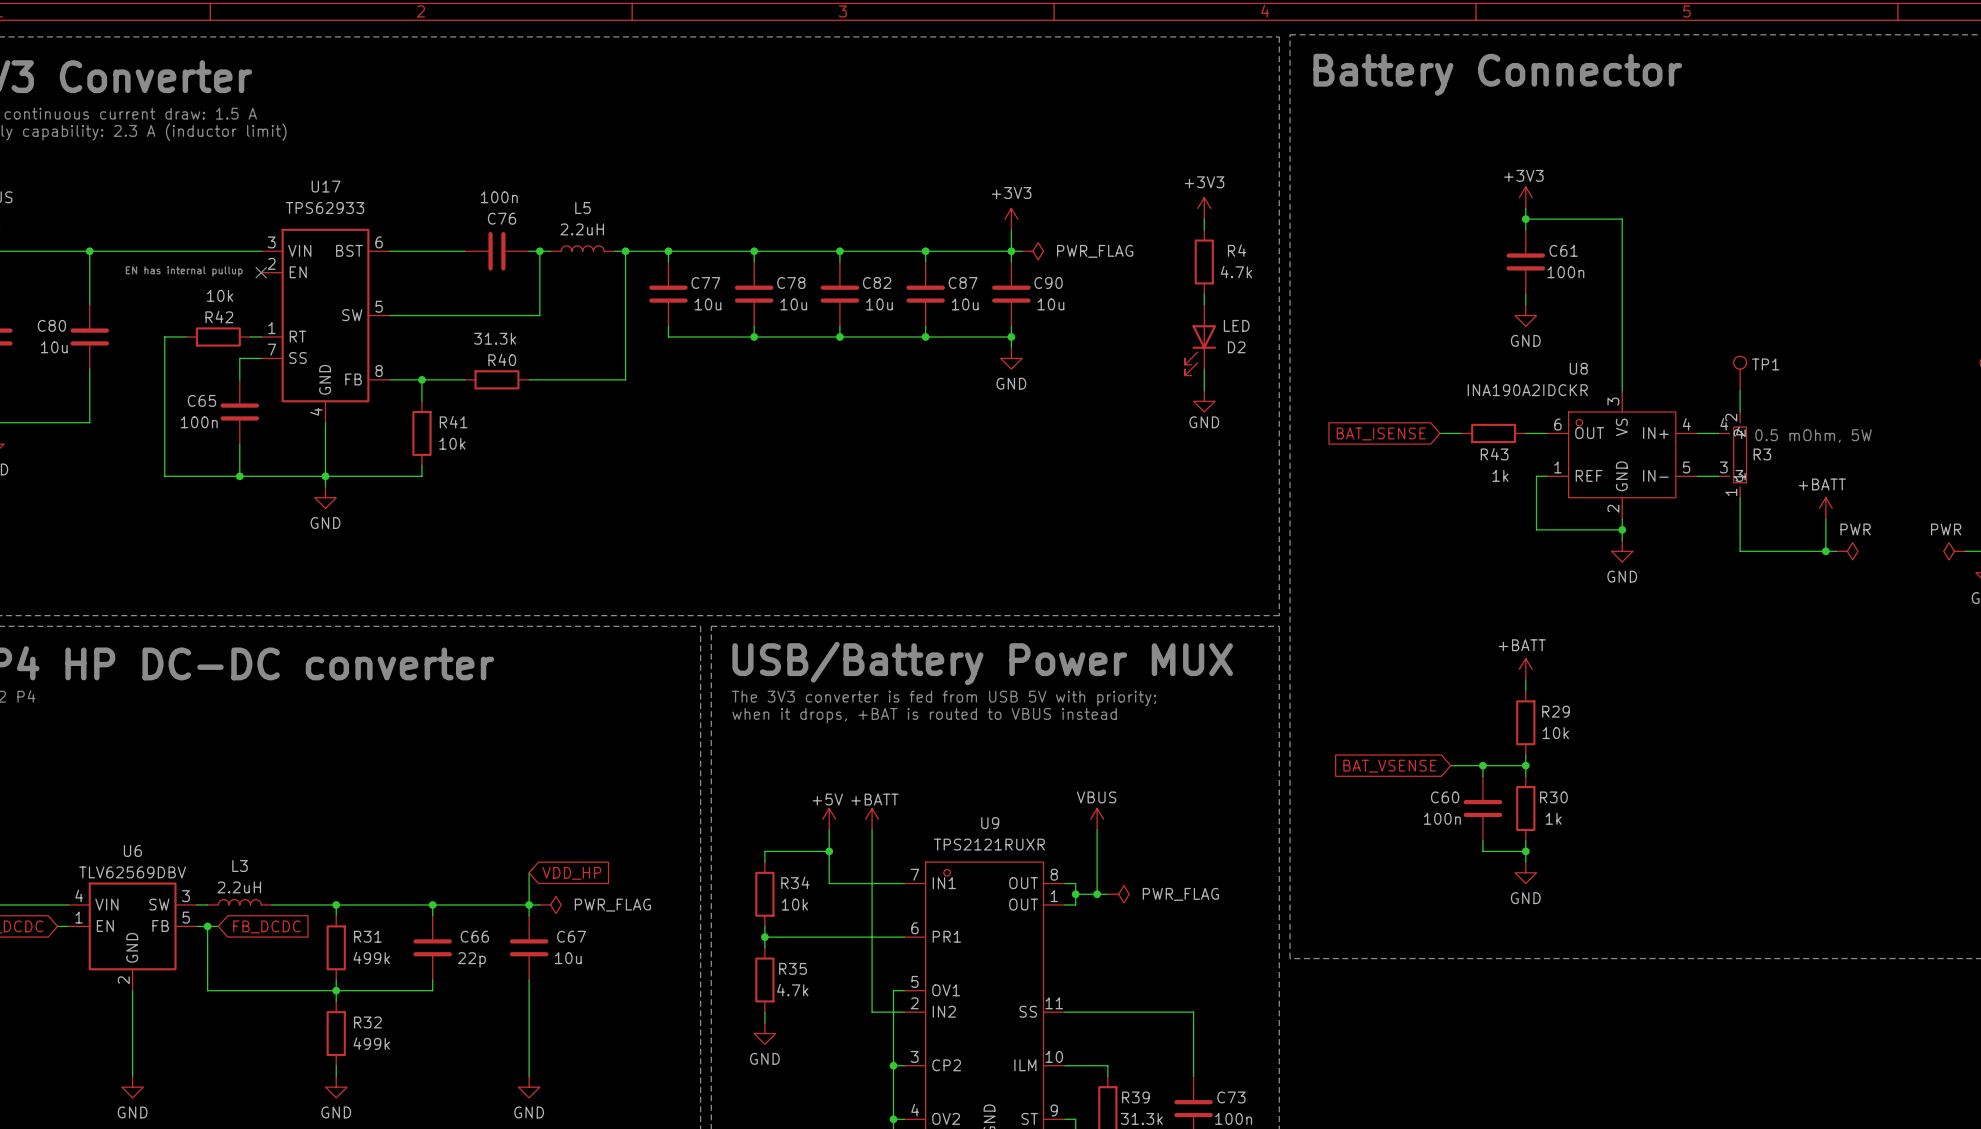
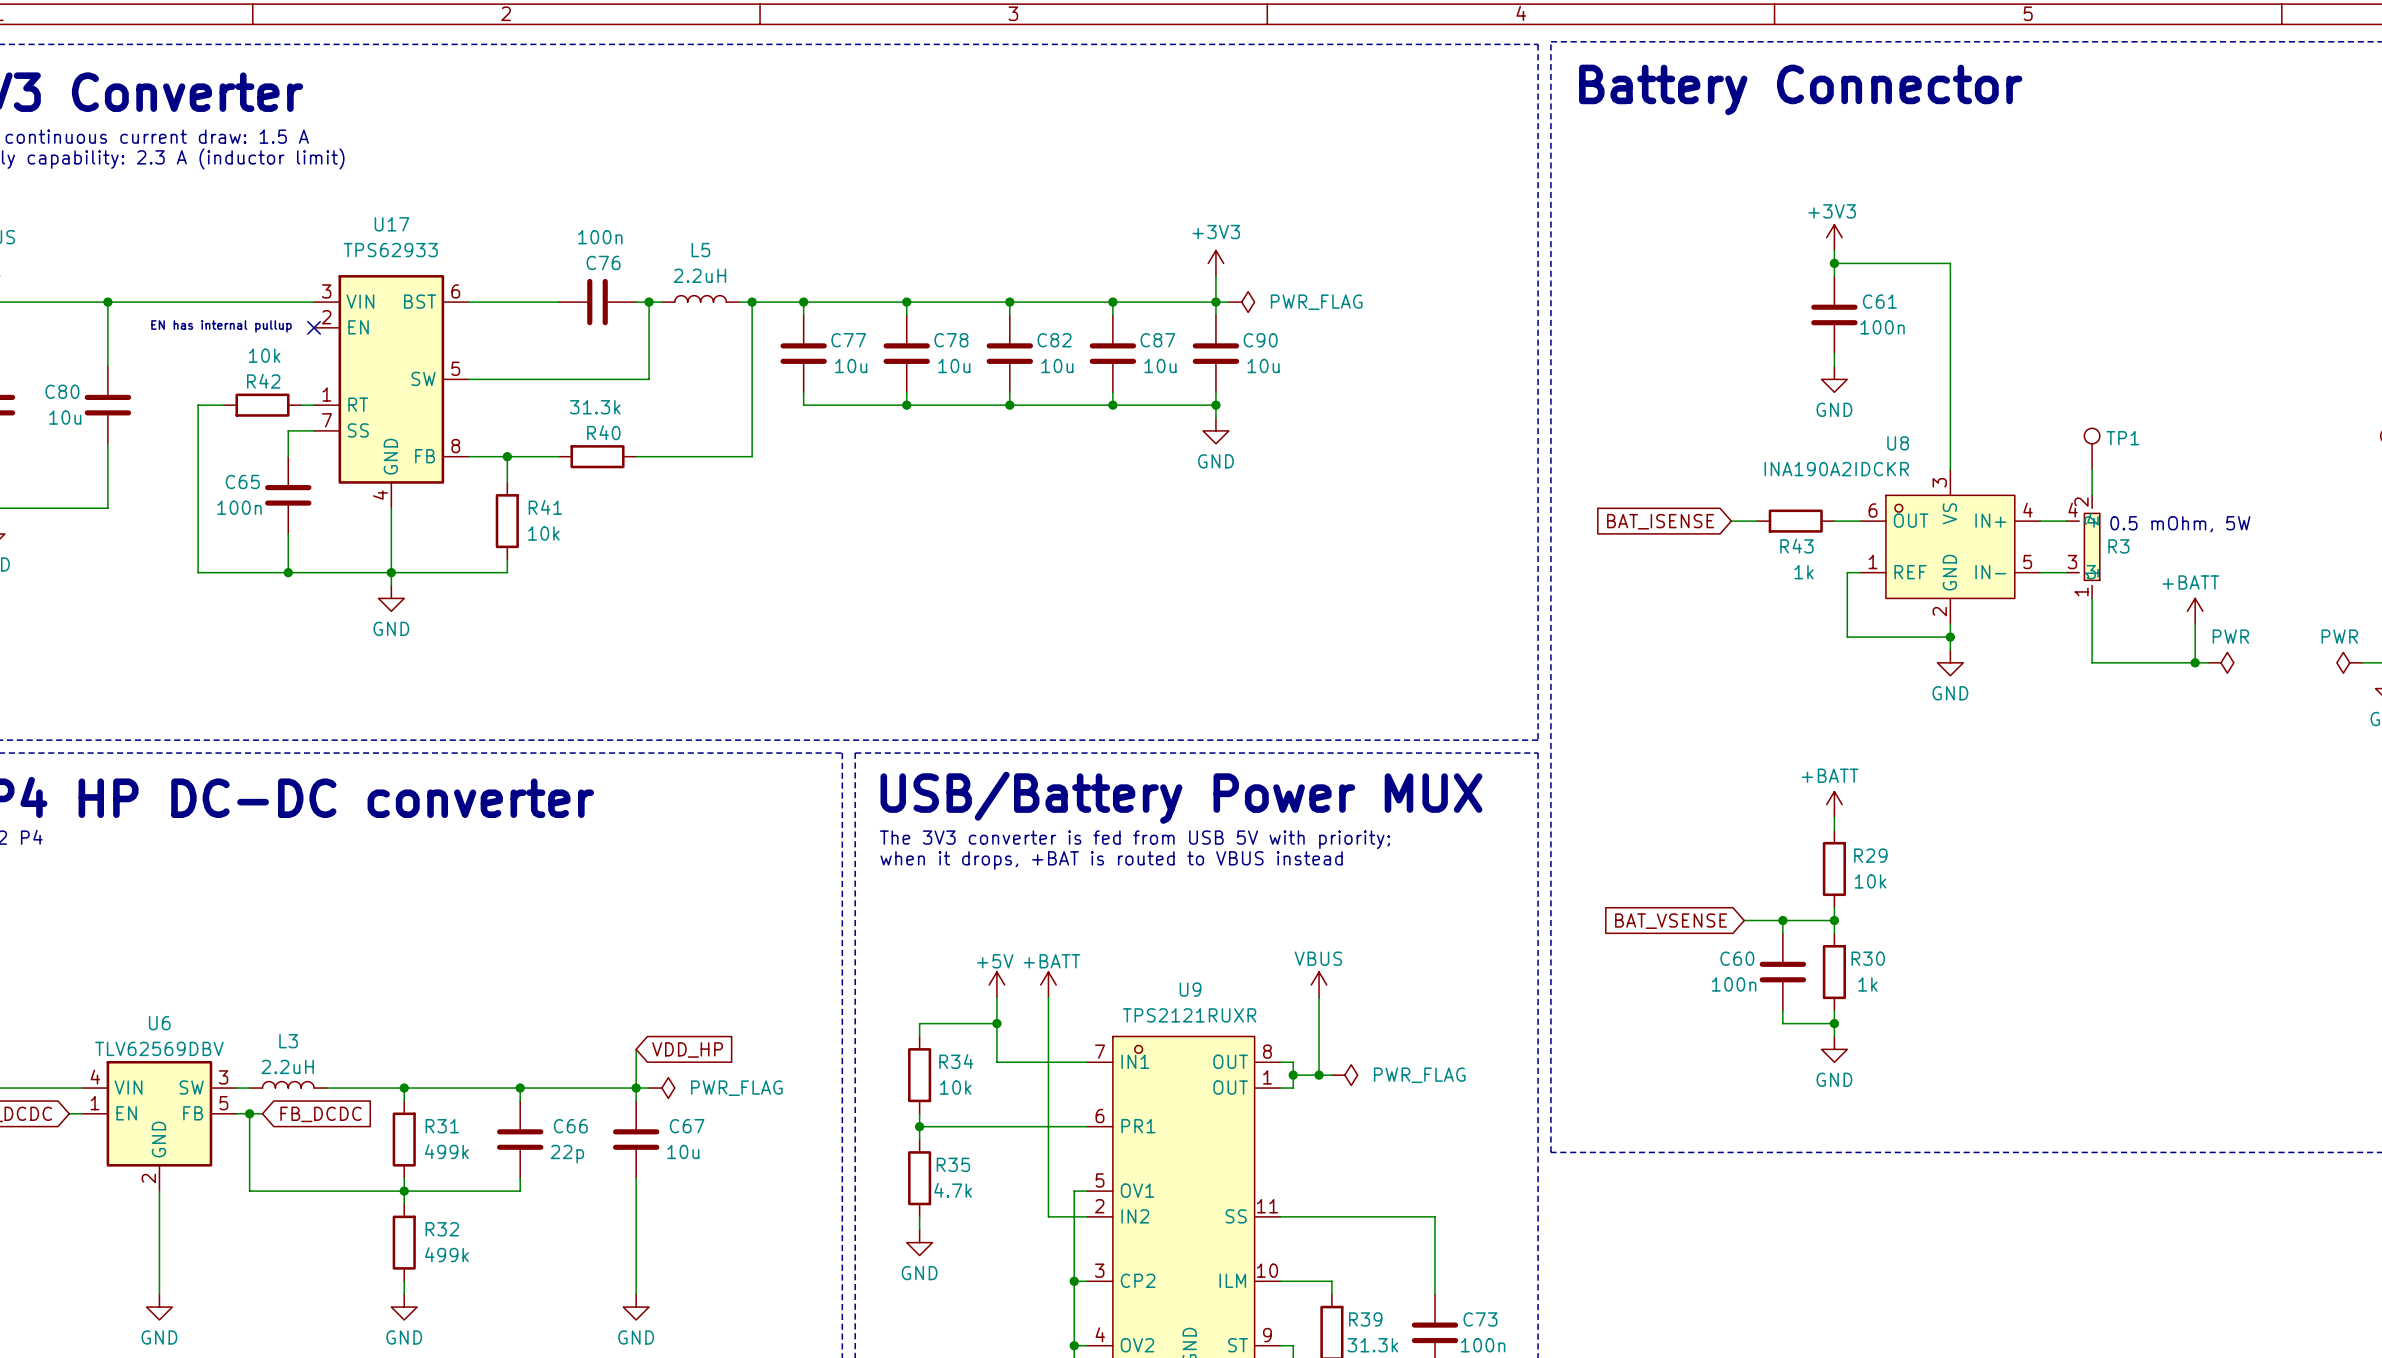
power symbol: +3V3 (1204, 208) -> none
wire: (1204, 219) (1204, 229) -> none
R4: 4.7k (1204, 261) -> none
wire: (1204, 294) (1204, 304) -> none
D2: LED (1200, 340) -> none
wire: (1204, 369) (1204, 390) -> none
power symbol: GND (1204, 401) -> none

